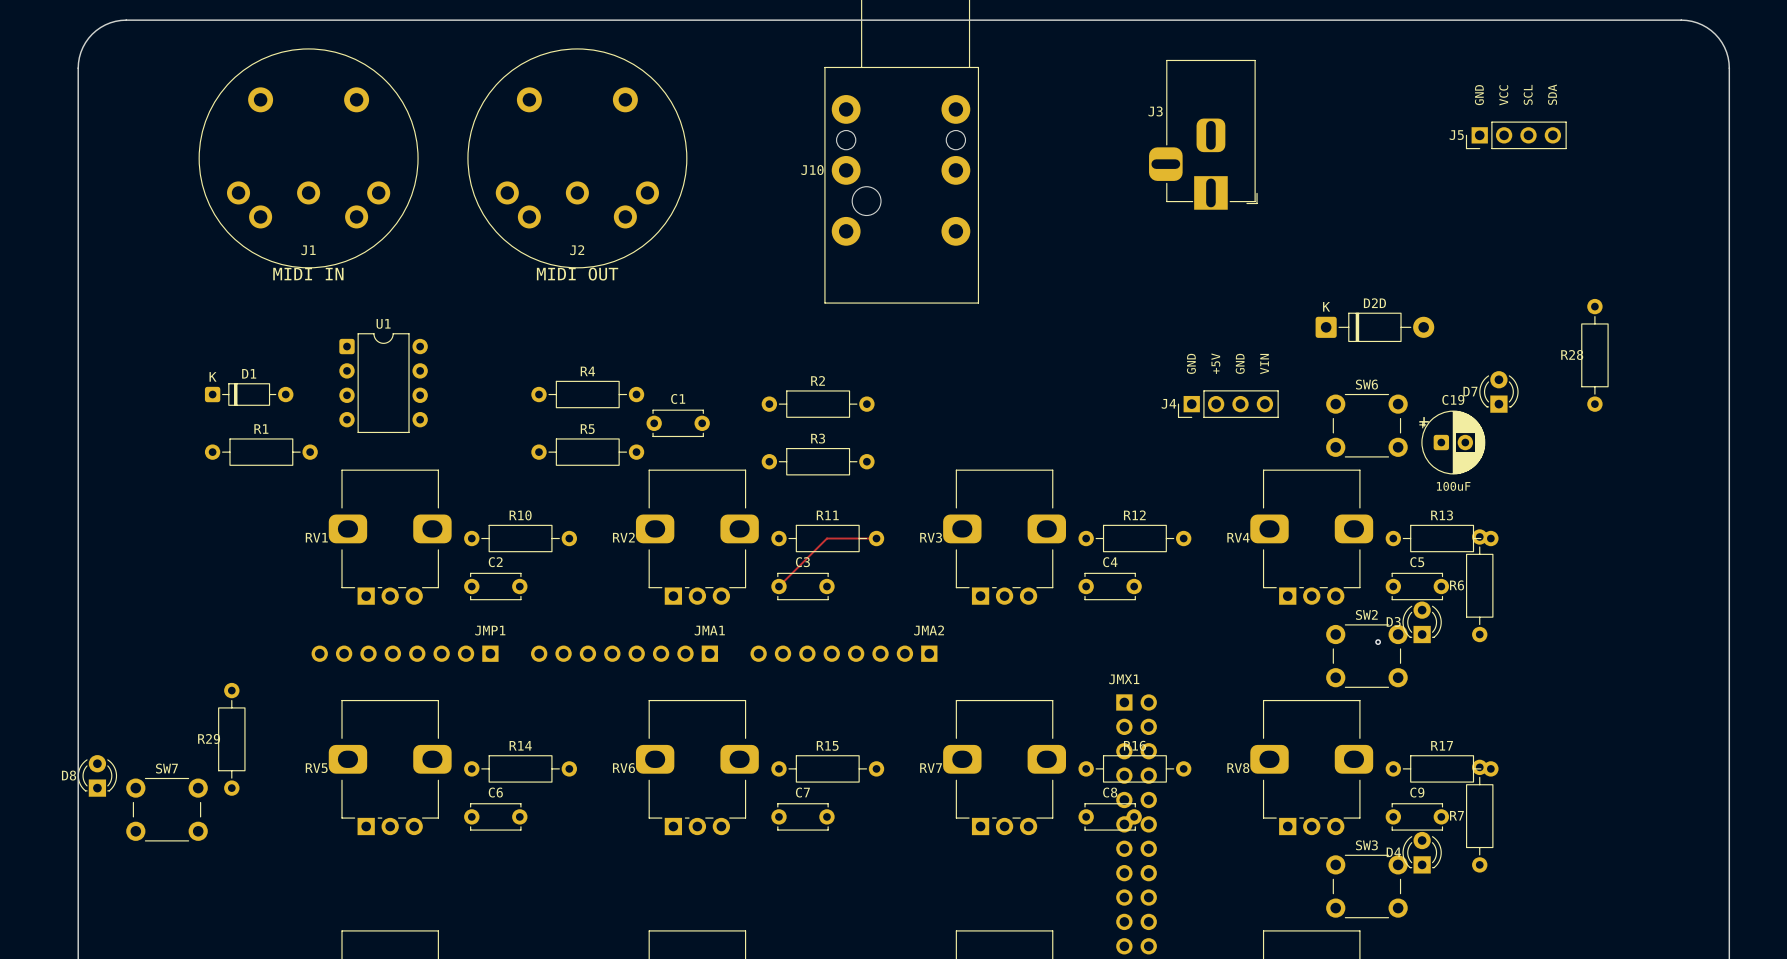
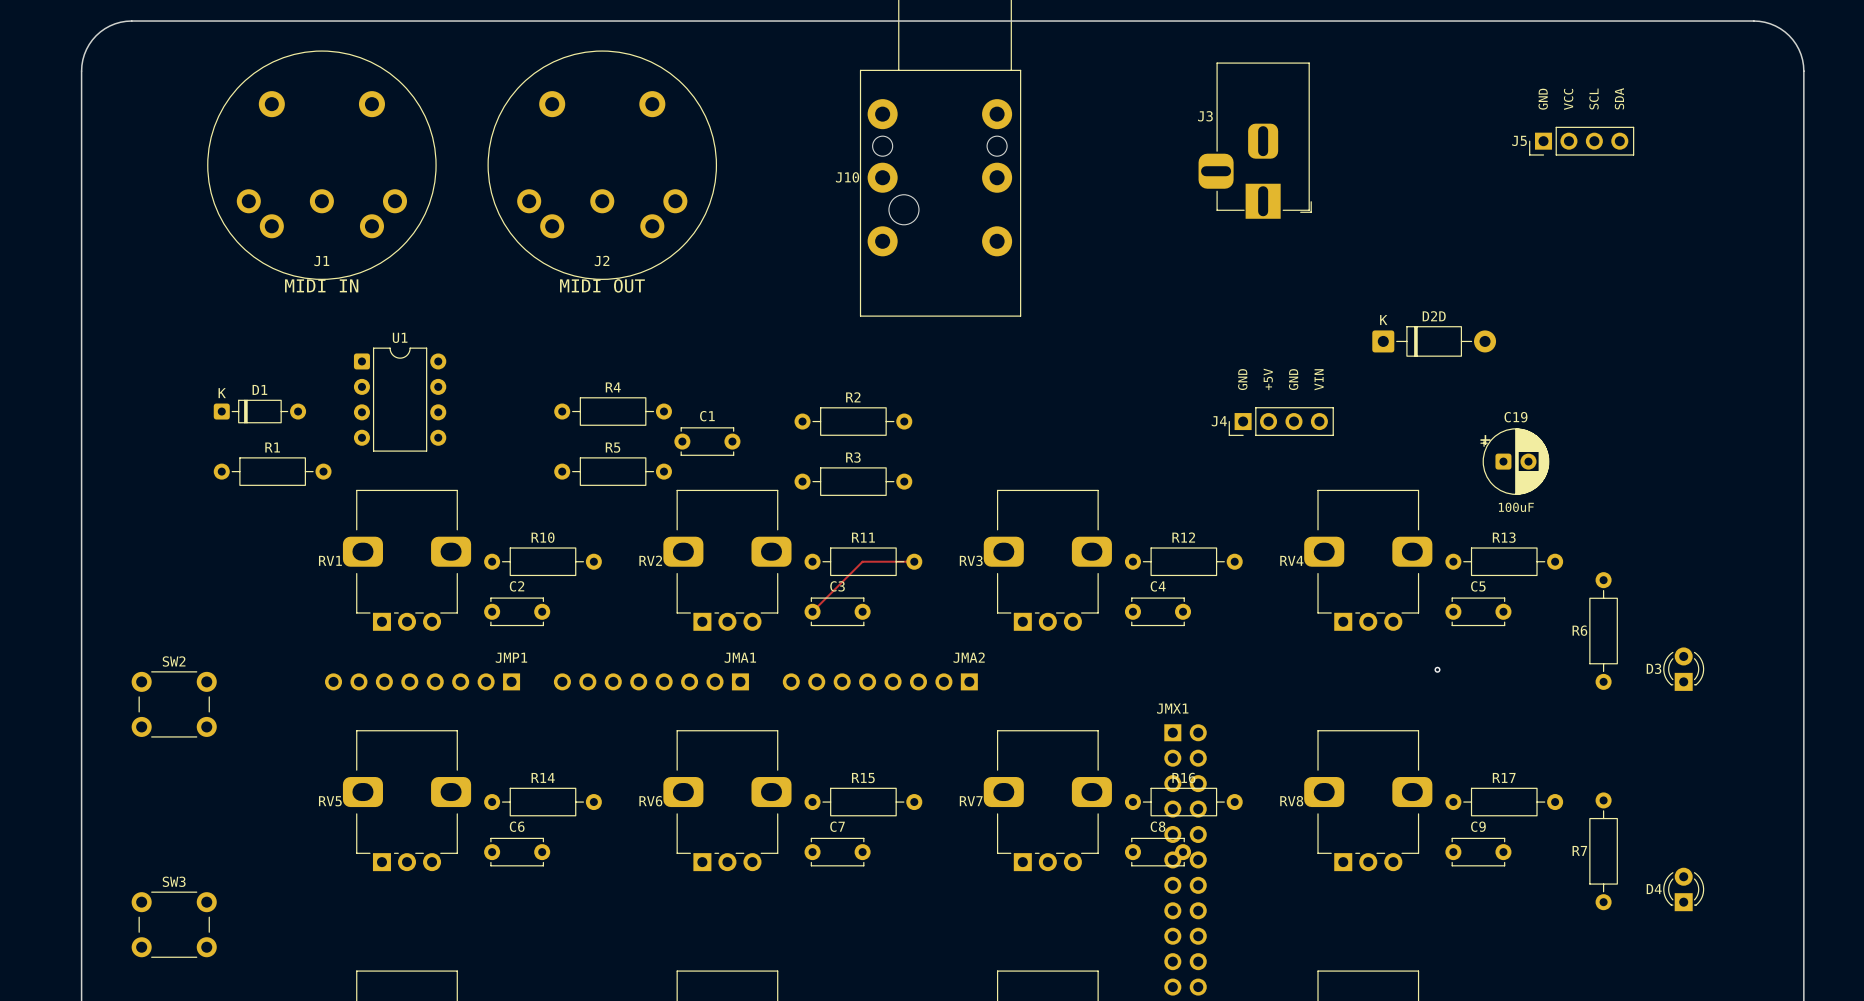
R28: (1594, 355) -> none
D7: (1498, 391) -> none
SW6: (1366, 425) -> none
R6 position: (1479, 585) -> (1603, 631)
D3 position: (1422, 622) -> (1683, 669)
SW2 position: (1366, 656) -> (174, 704)
R29: (231, 739) -> none
D8: (97, 775) -> none
SW7: (167, 809) -> none
R7 position: (1479, 816) -> (1603, 851)
D4 position: (1422, 852) -> (1683, 889)
SW3 position: (1366, 886) -> (174, 924)

